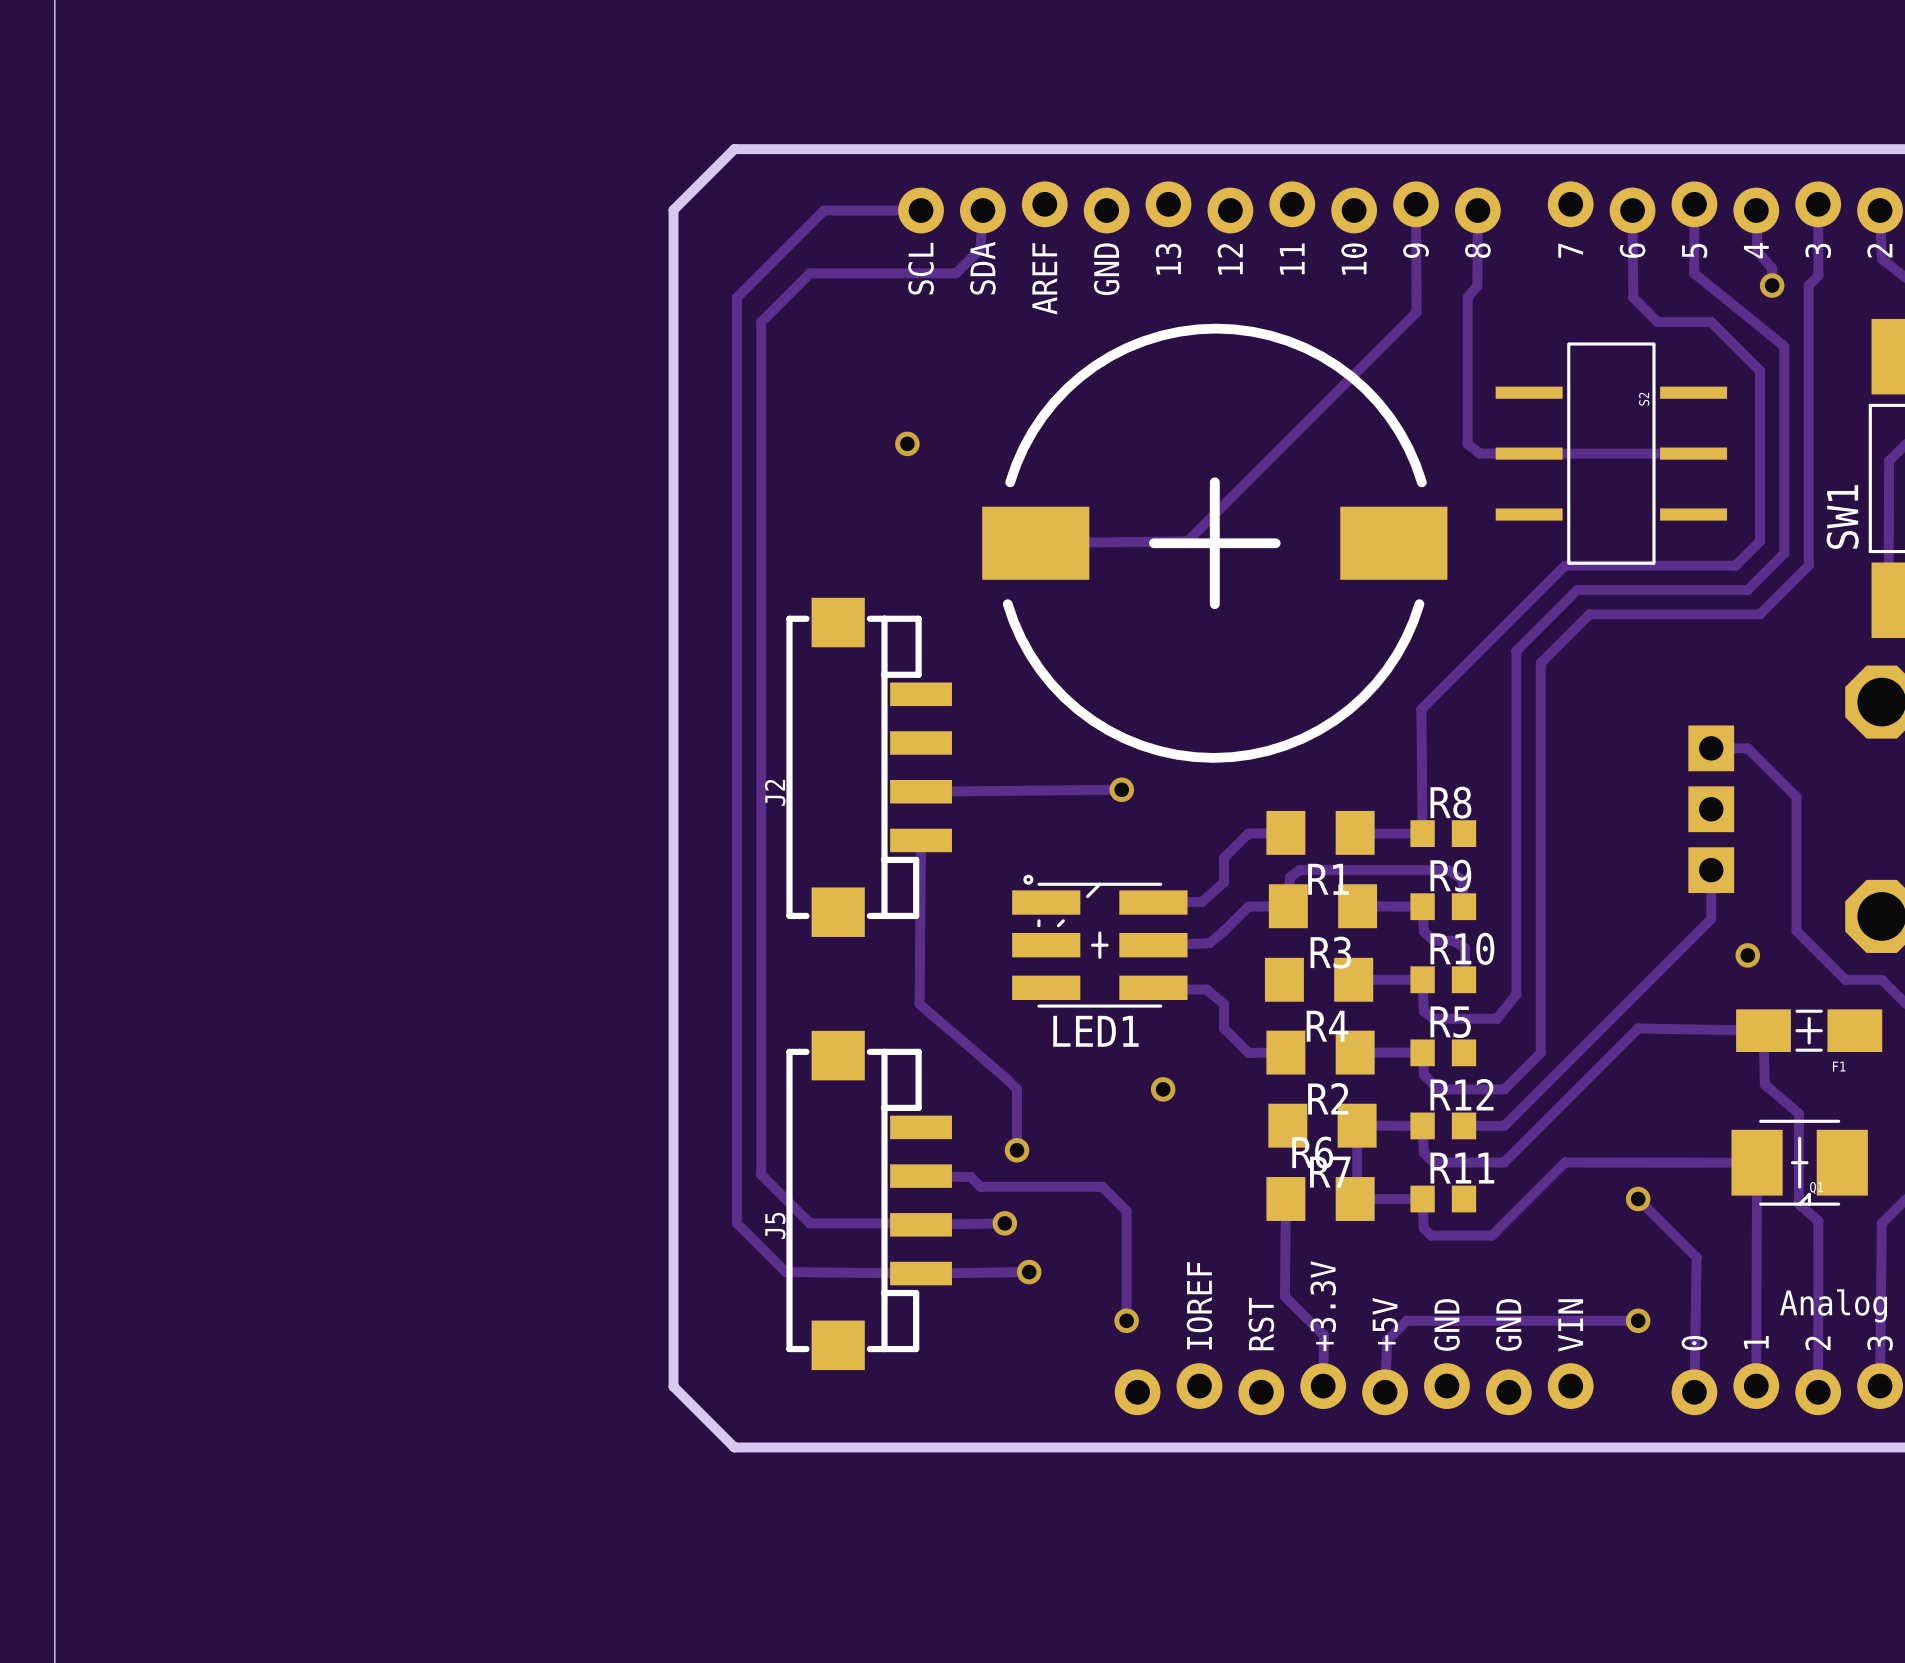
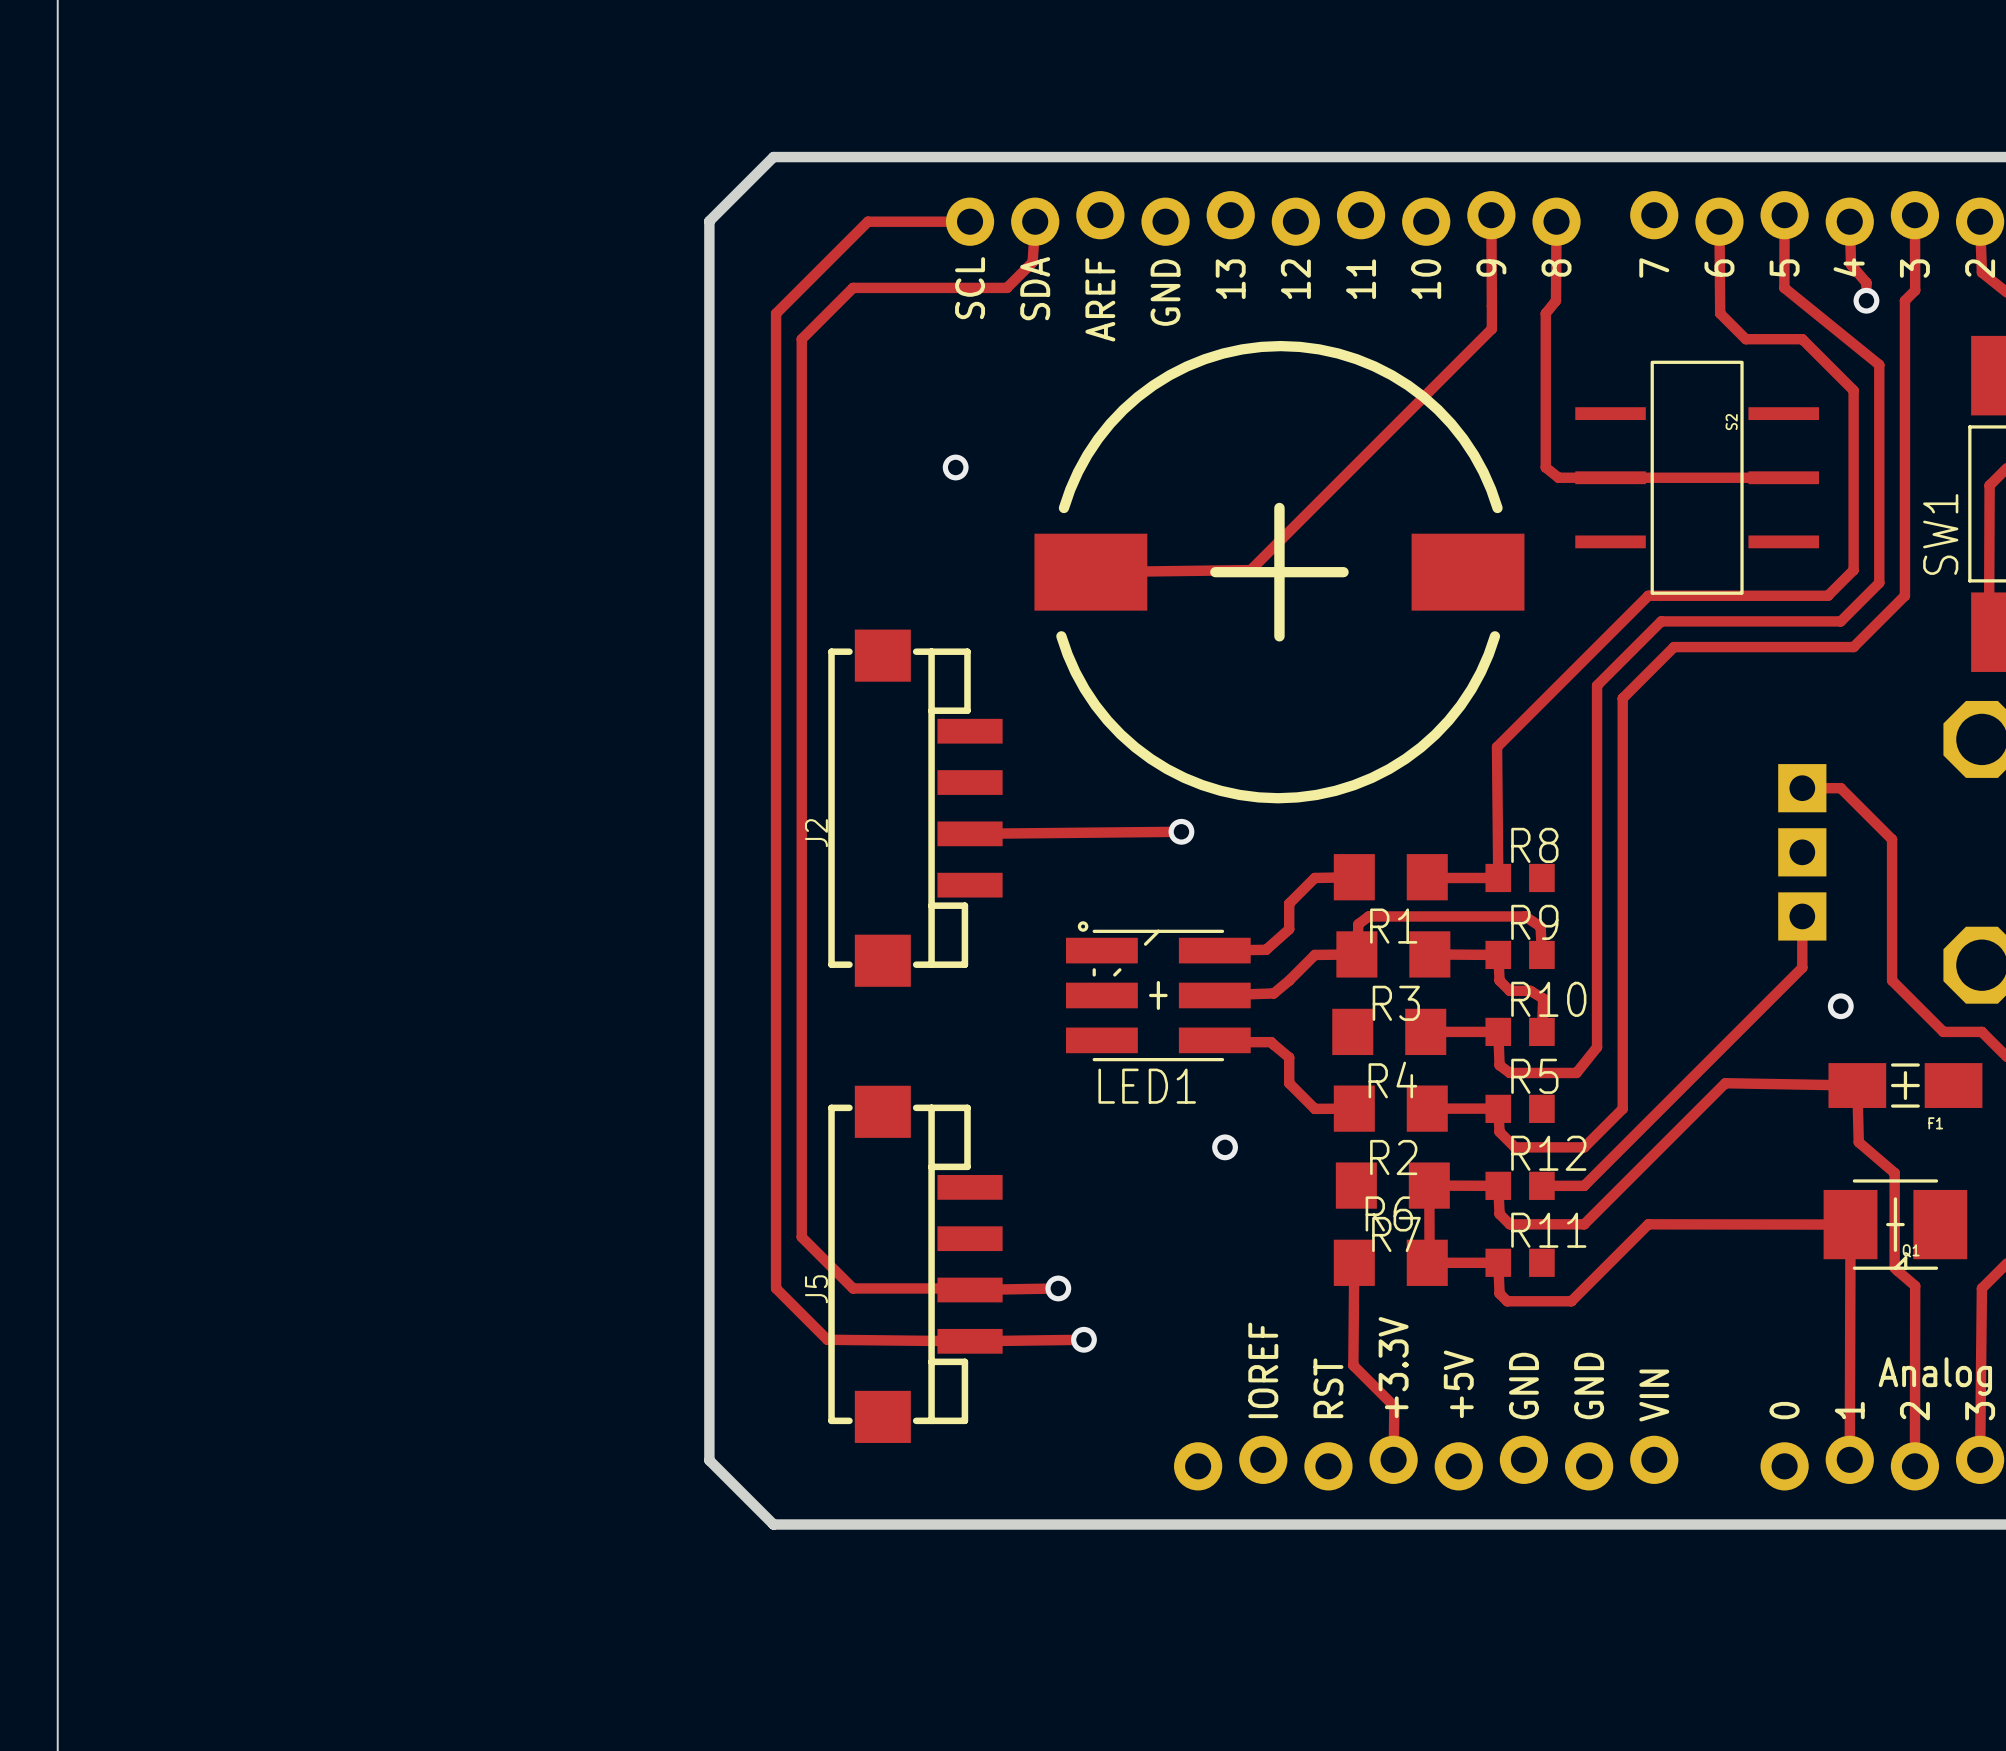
track: (921, 840) (919, 1004) (1017, 1089) (1017, 1150) -> none
via: (1017, 1150) -> none
track: (921, 1176) (970, 1177) (980, 1186) (1102, 1186) (1126, 1211) (1126, 1320) -> none
track: (1638, 1199) (1696, 1257) (1694, 1392) -> none
via: (1638, 1199) -> none
via: (1126, 1320) -> none
track: (1638, 1320) (1406, 1320) (1387, 1340) (1385, 1392) -> none
via: (1638, 1320) -> none

